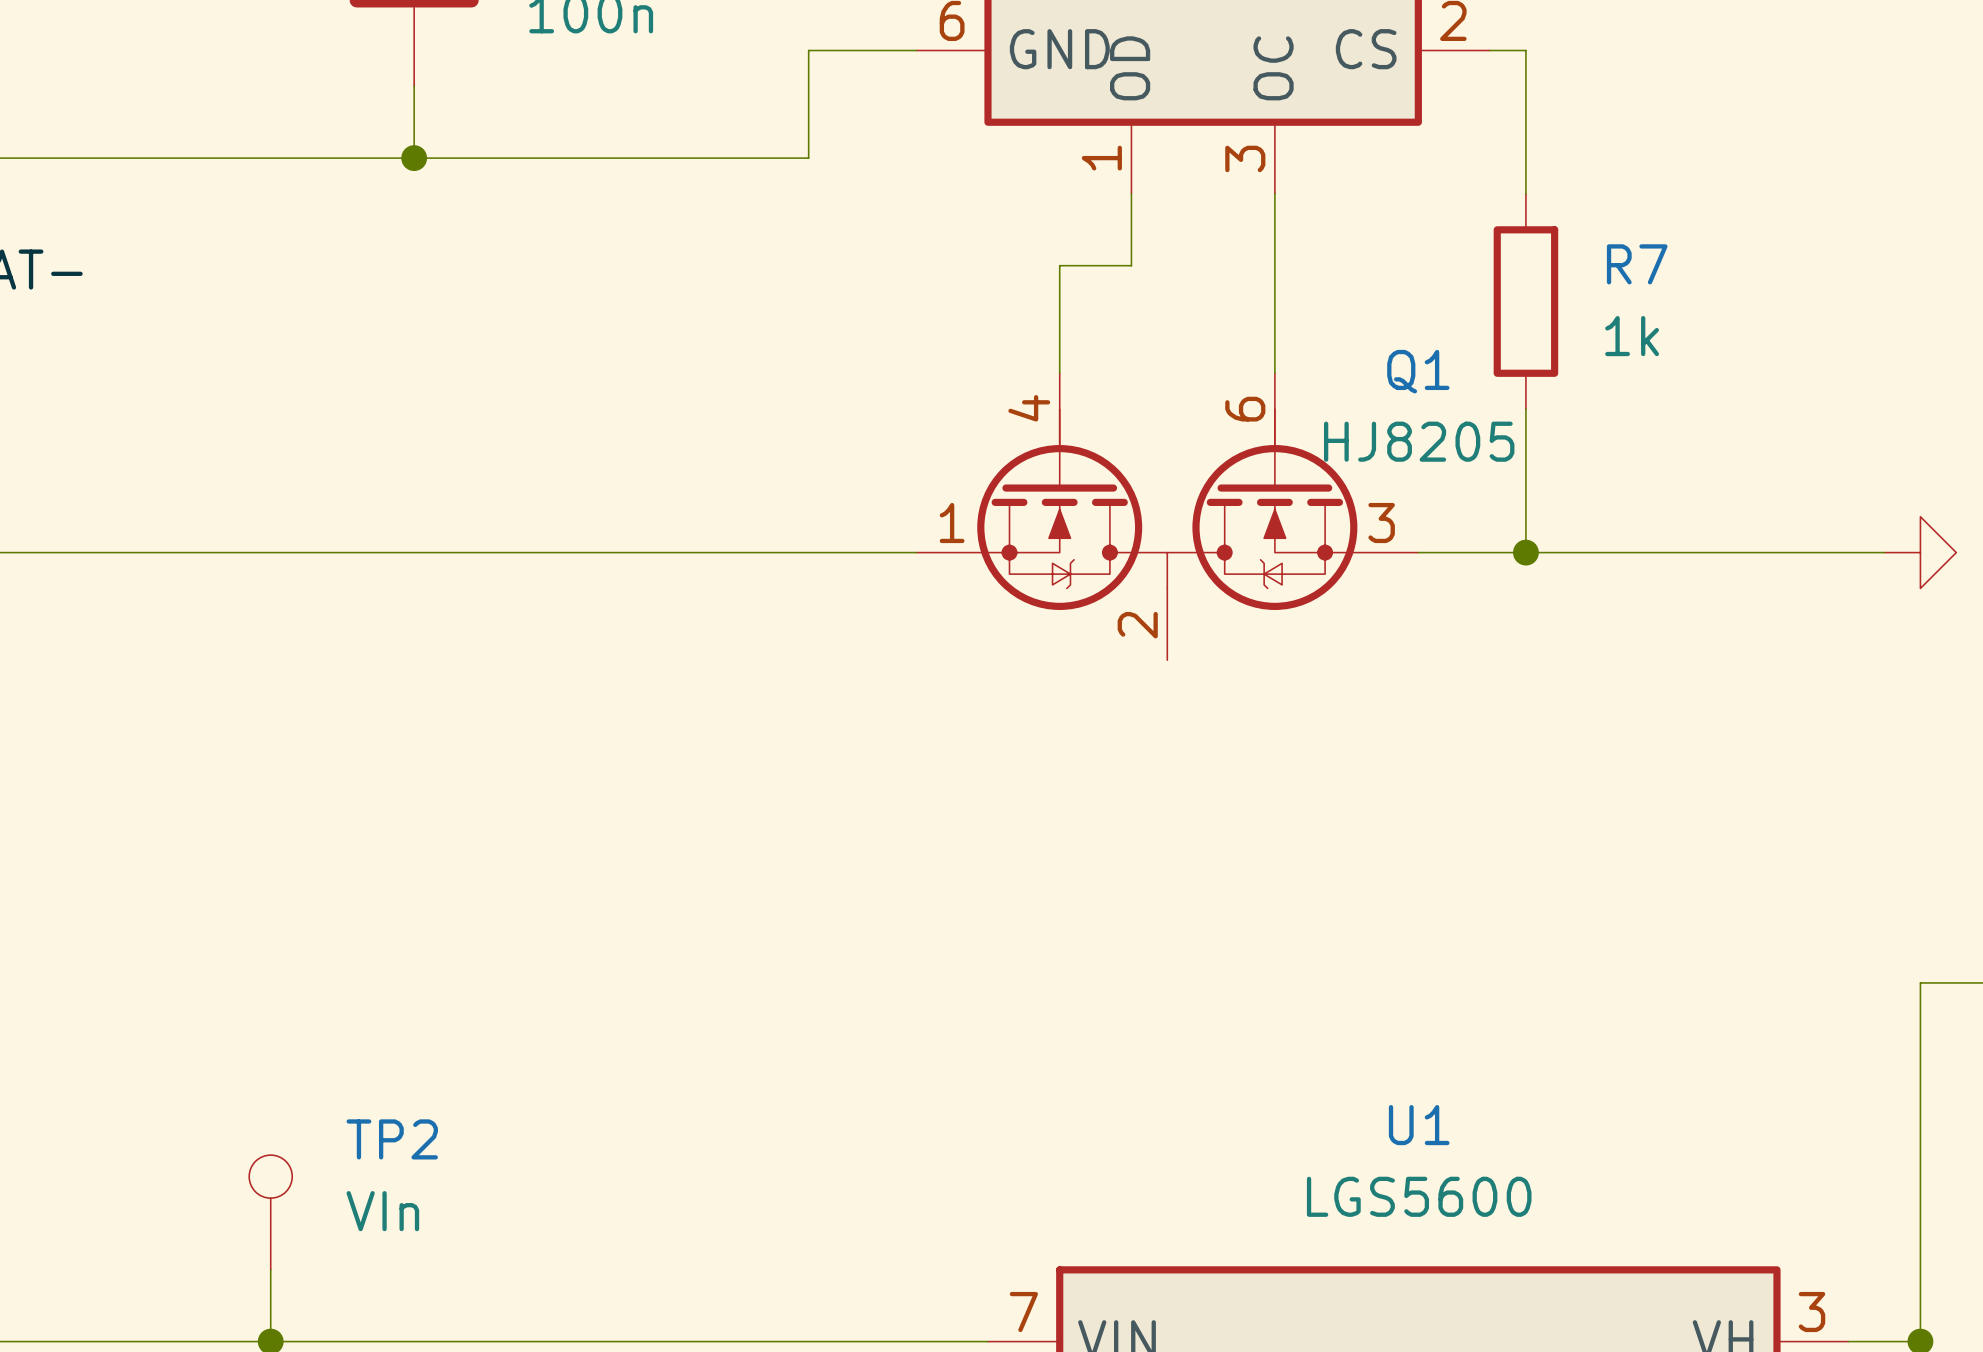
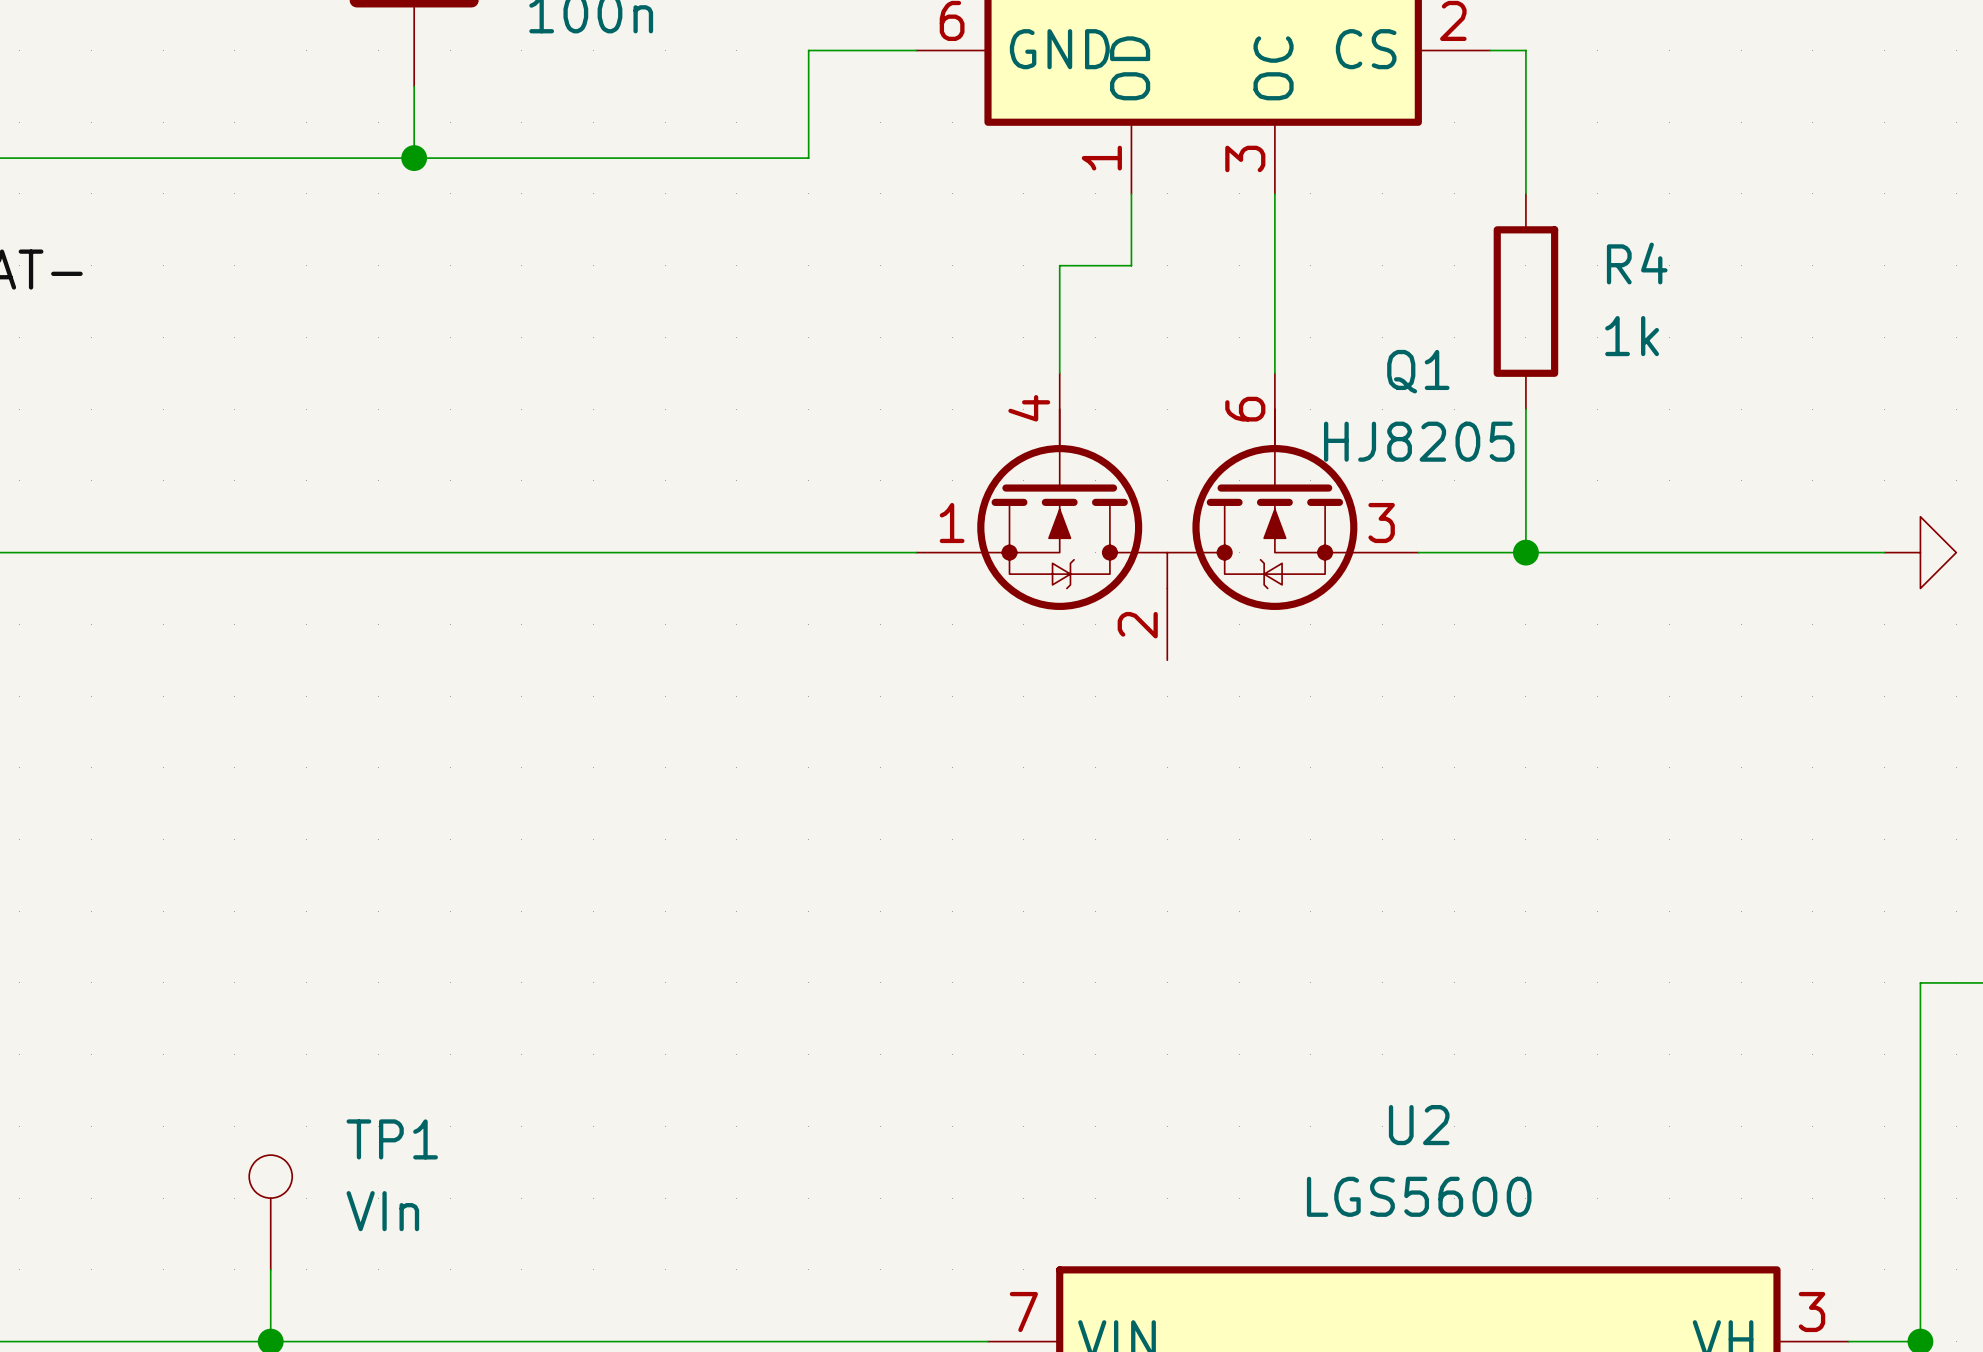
R7 name: R7 (1637, 264) -> R4 (1637, 263)
U1 name: U1 (1419, 1125) -> U2 (1419, 1125)
TP2 name: TP2 (392, 1139) -> TP1 (392, 1139)

